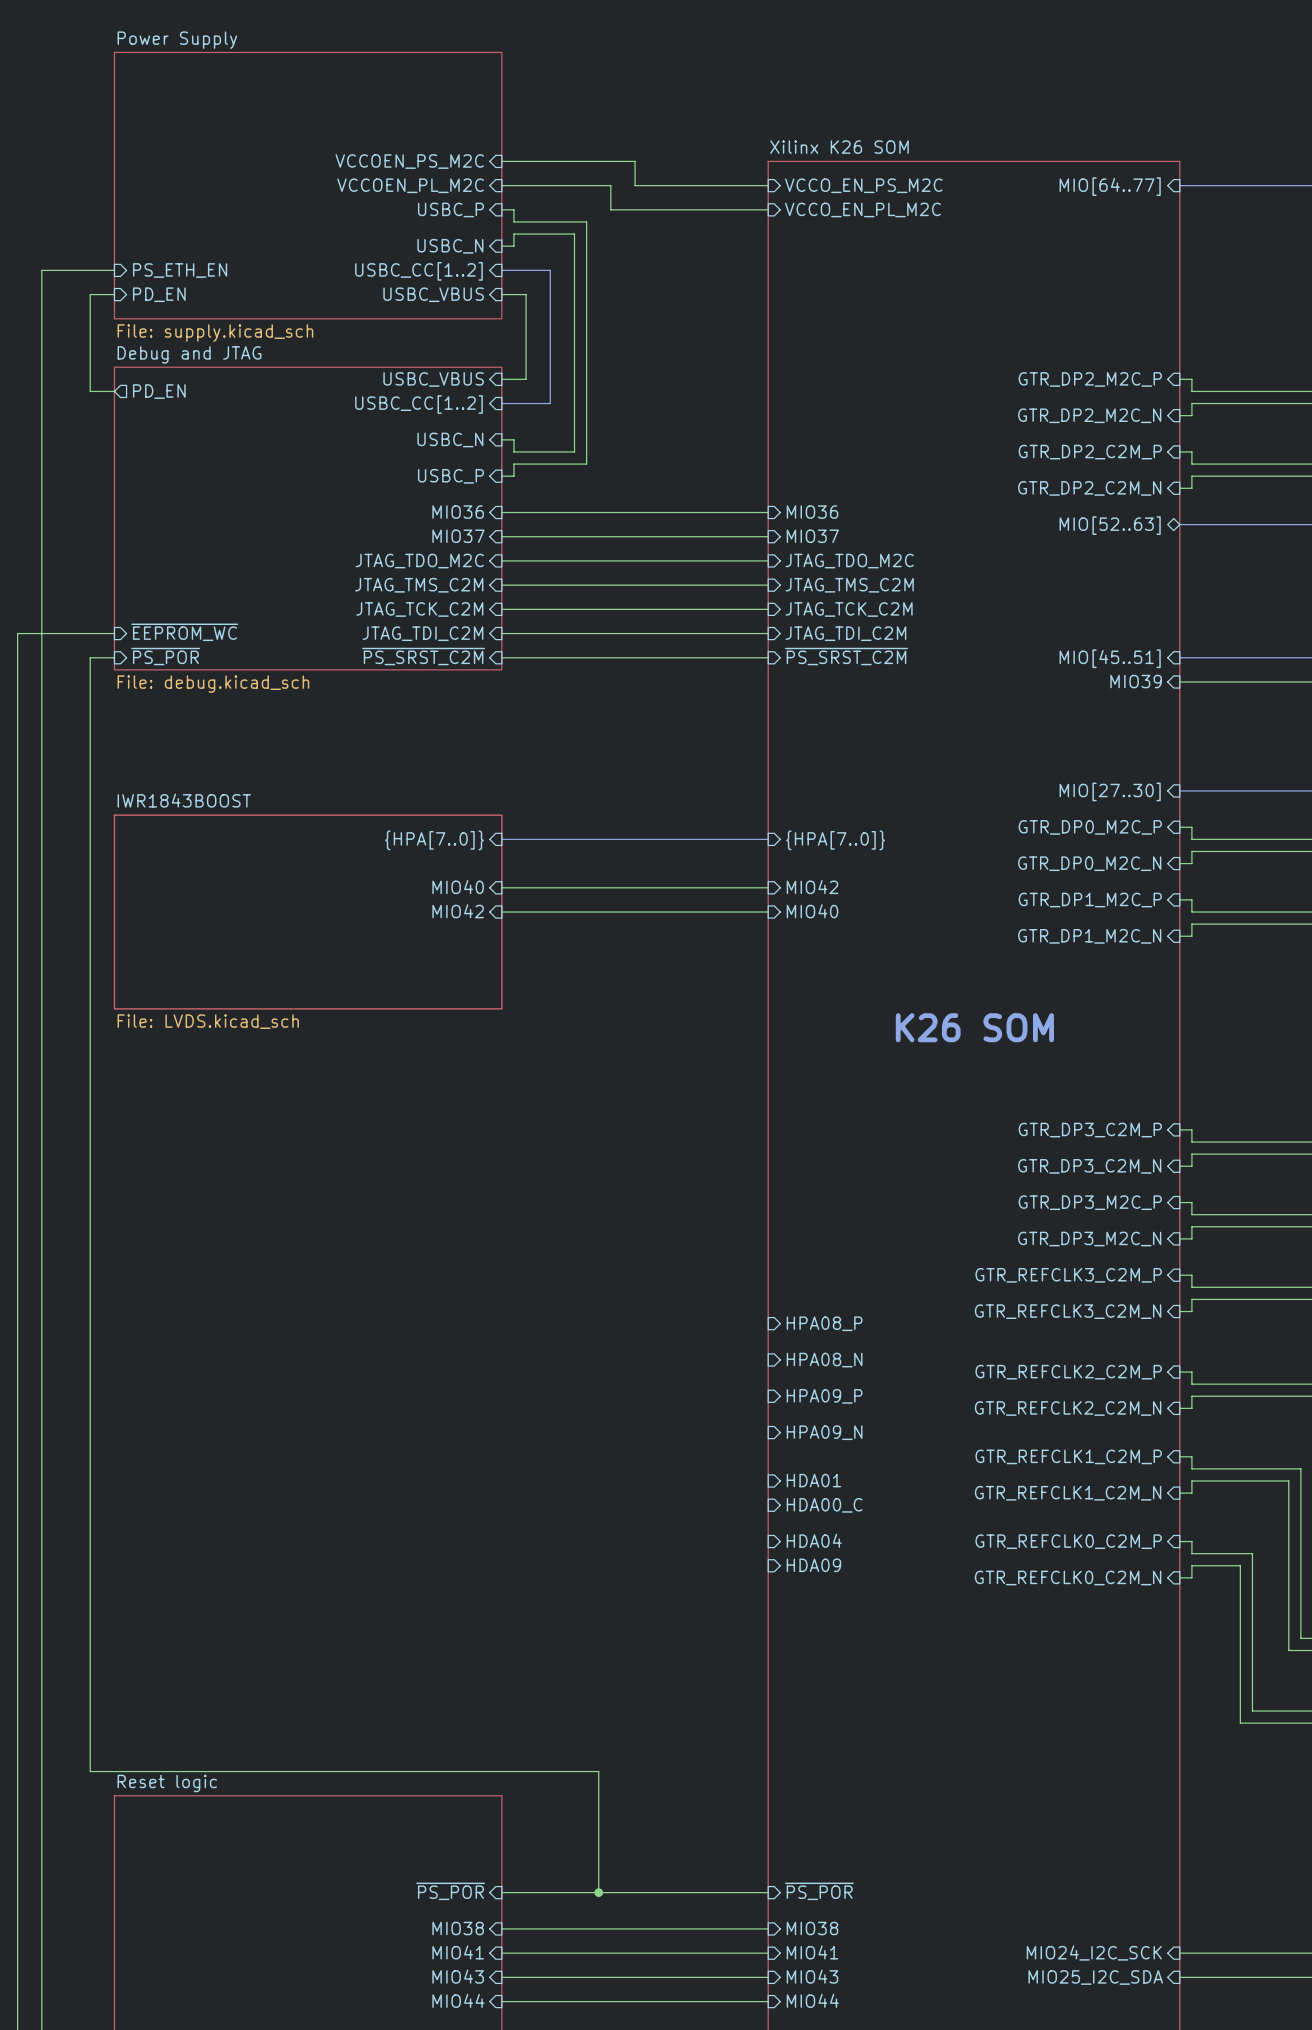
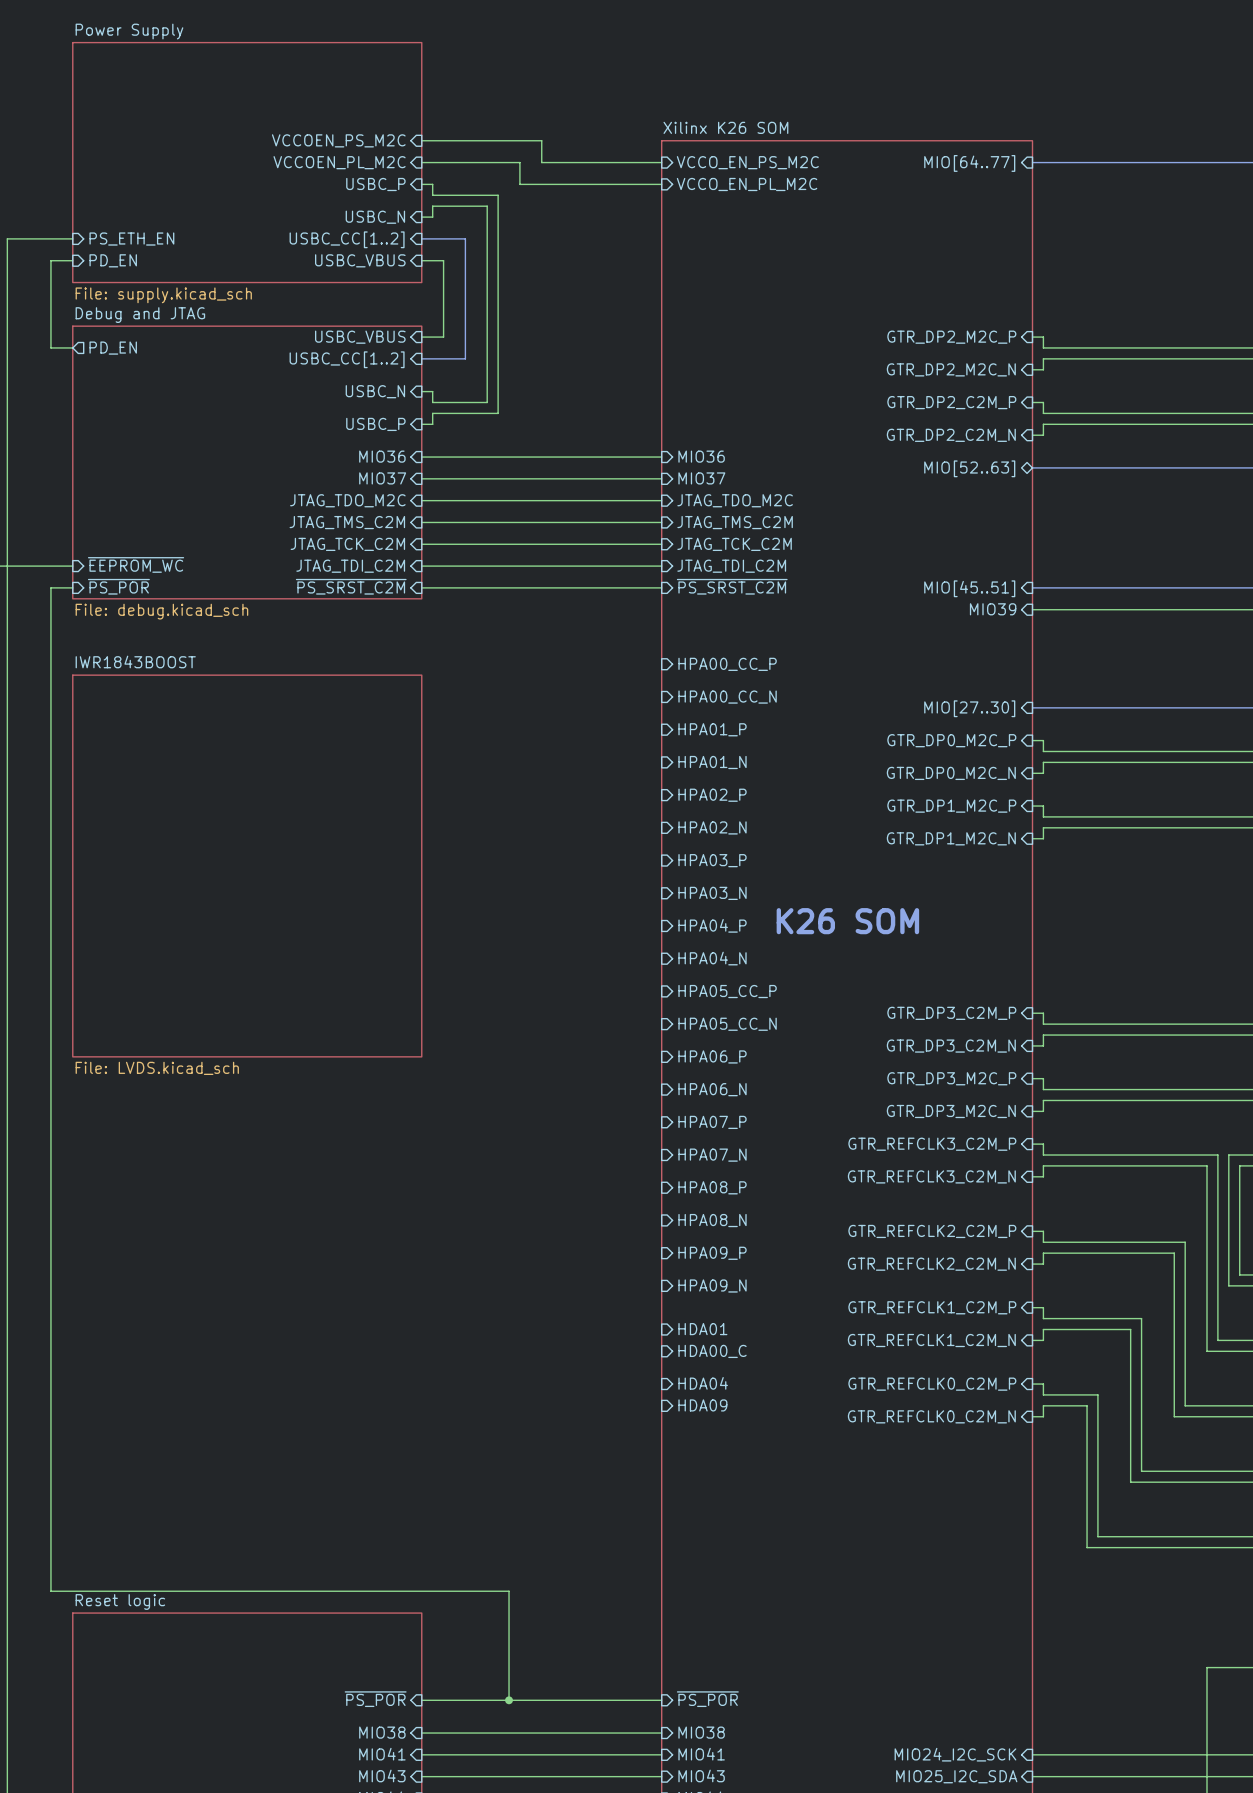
sheet pin: none -> HPA00_CC_P (727, 664)
sheet pin: none -> HPA00_CC_N (727, 697)
sheet IWR1843BOOST name position: IWR1843BOOST (184, 800) -> IWR1843BOOST (135, 661)
sheet IWR1843BOOST shape: [113, 814, 503, 1010] -> [72, 674, 423, 1058]
sheet pin: none -> HPA01_P (712, 729)
bus: (501, 839) (768, 839) -> none
sheet pin: {HPA[7..0]} (434, 840) -> none
sheet pin: {HPA[7..0]} (835, 840) -> none
sheet pin: none -> HPA01_N (712, 762)
sheet pin: MIO40 (458, 887) -> none
wire: (501, 887) (768, 887) -> none
sheet pin: MIO42 (812, 887) -> HPA02_P (712, 795)
sheet pin: MIO42 (458, 911) -> none
sheet pin: MIO40 (812, 911) -> none
wire: (501, 912) (768, 912) -> none
sheet pin: none -> HPA02_N (712, 827)
sheet pin: none -> HPA03_P (712, 860)
sheet pin: none -> HPA03_N (712, 893)
sheet IWR1843BOOST value position: File: LVDS.kicad_sch (208, 1021) -> File: LVDS.kicad_sch (157, 1068)
sheet pin: none -> HPA04_P (712, 925)
sheet pin: none -> HPA04_N (712, 958)
sheet pin: none -> HPA05_CC_P (727, 991)
sheet pin: none -> HPA05_CC_N (727, 1024)
sheet pin: none -> HPA06_P (712, 1056)
sheet pin: none -> HPA06_N (712, 1089)
sheet pin: none -> HPA07_P (712, 1122)
sheet pin: none -> HPA07_N (712, 1155)

